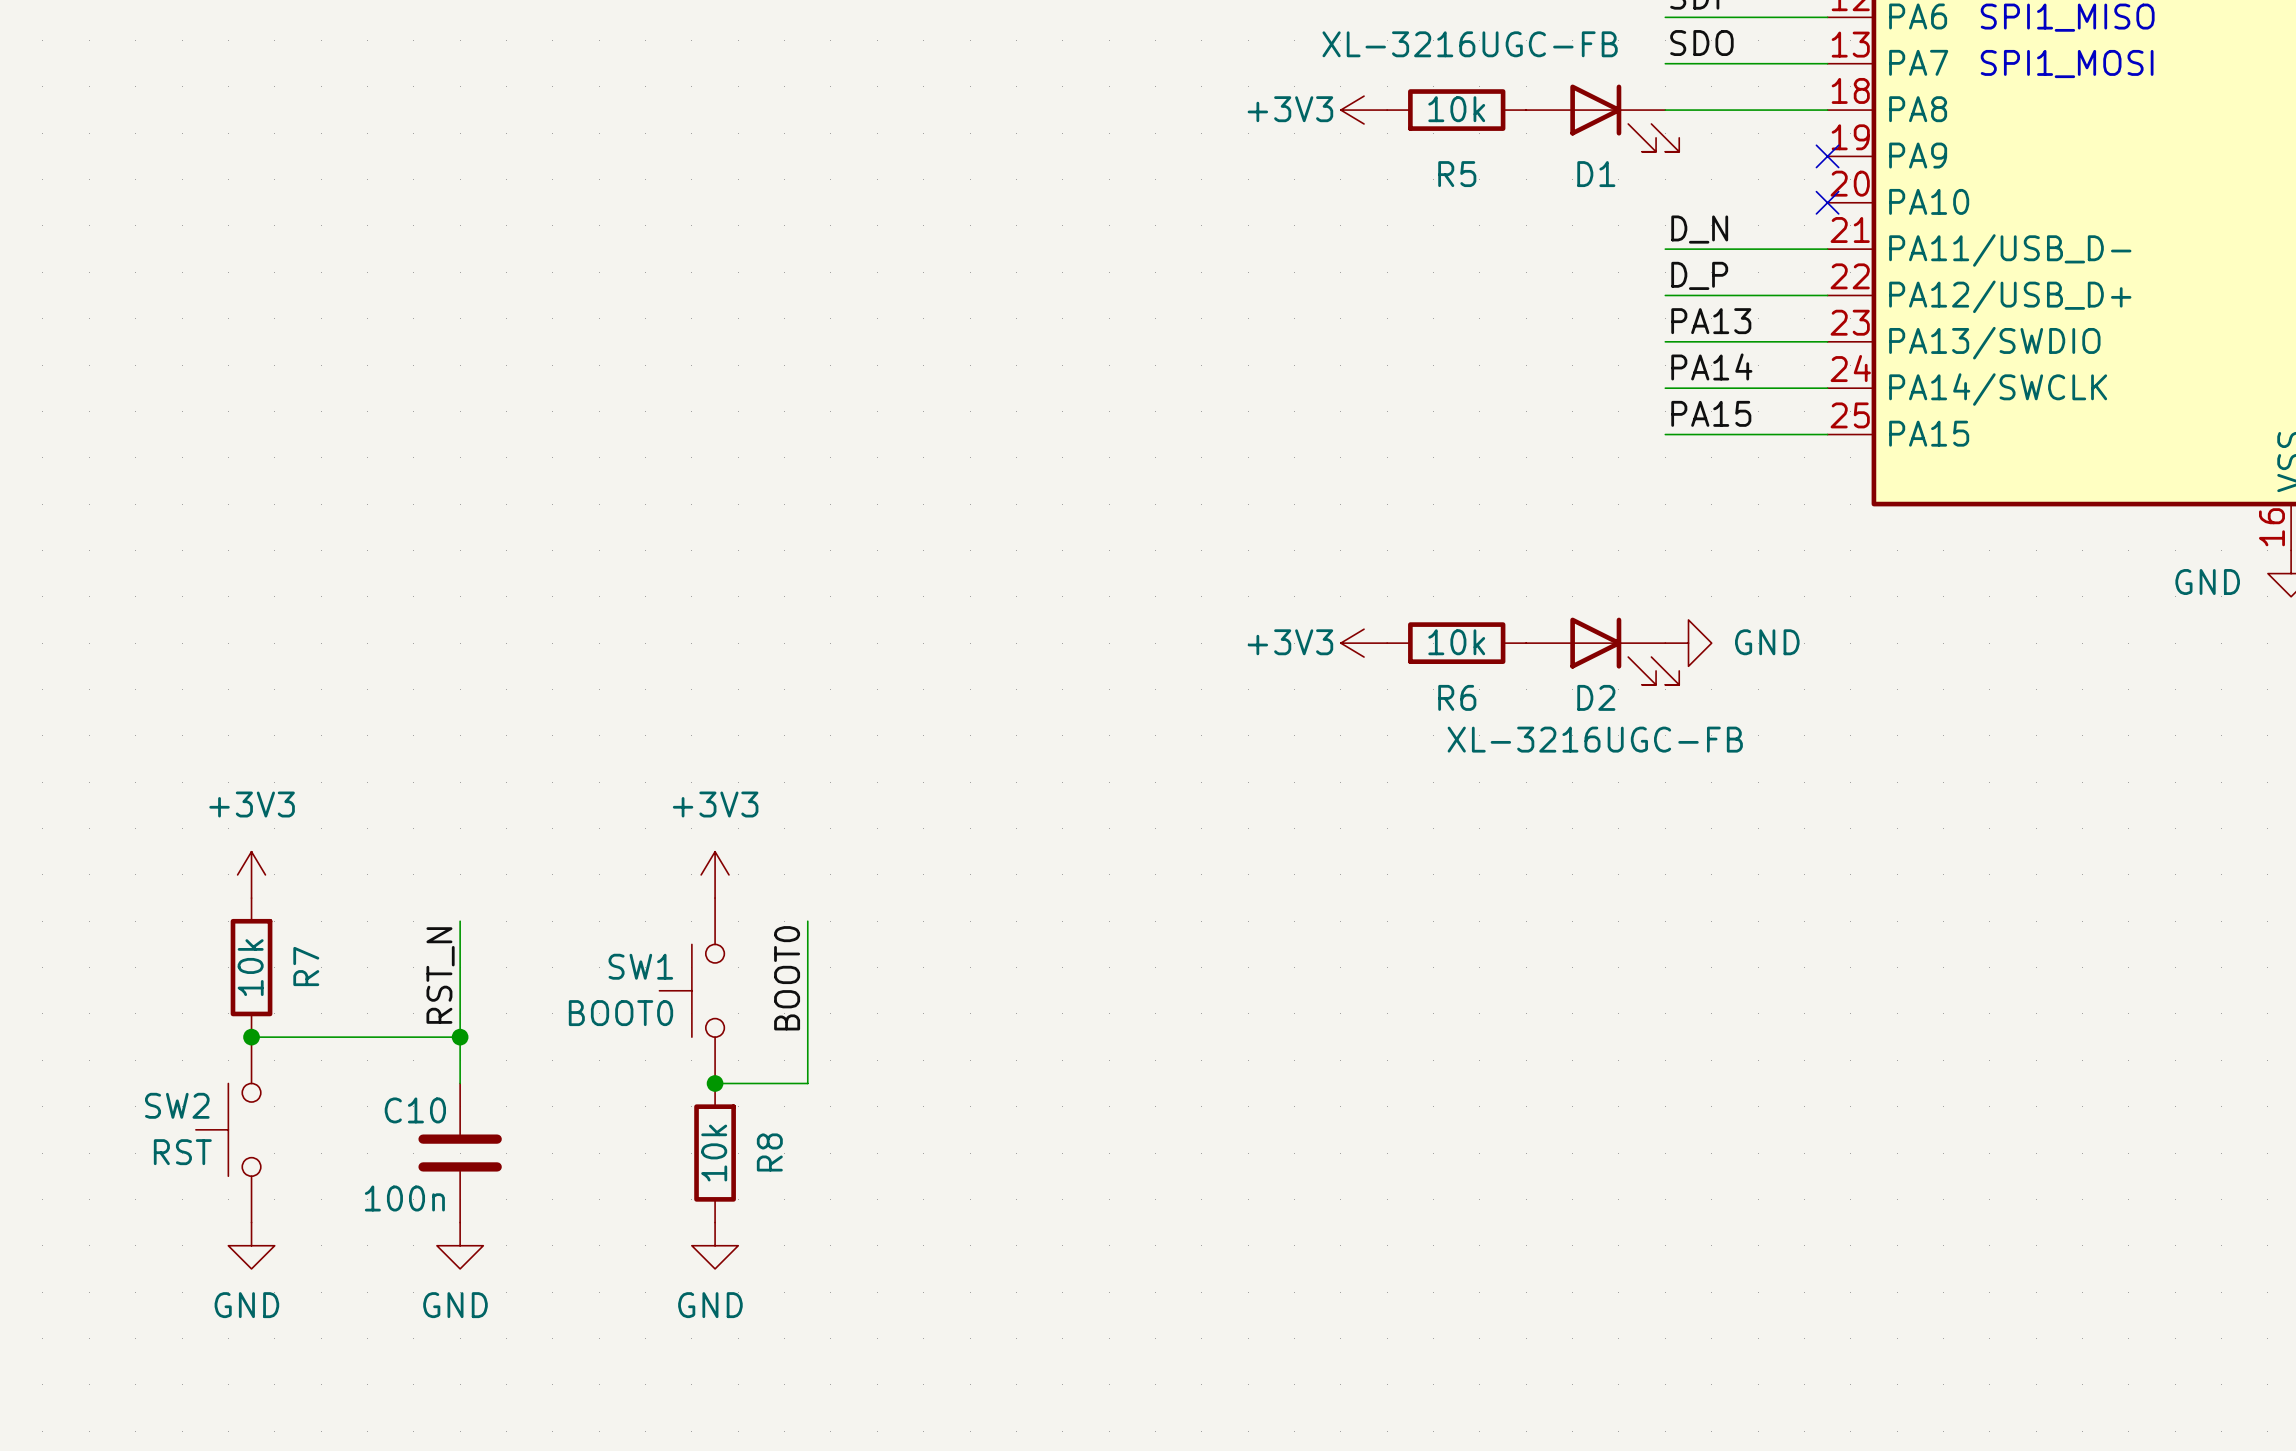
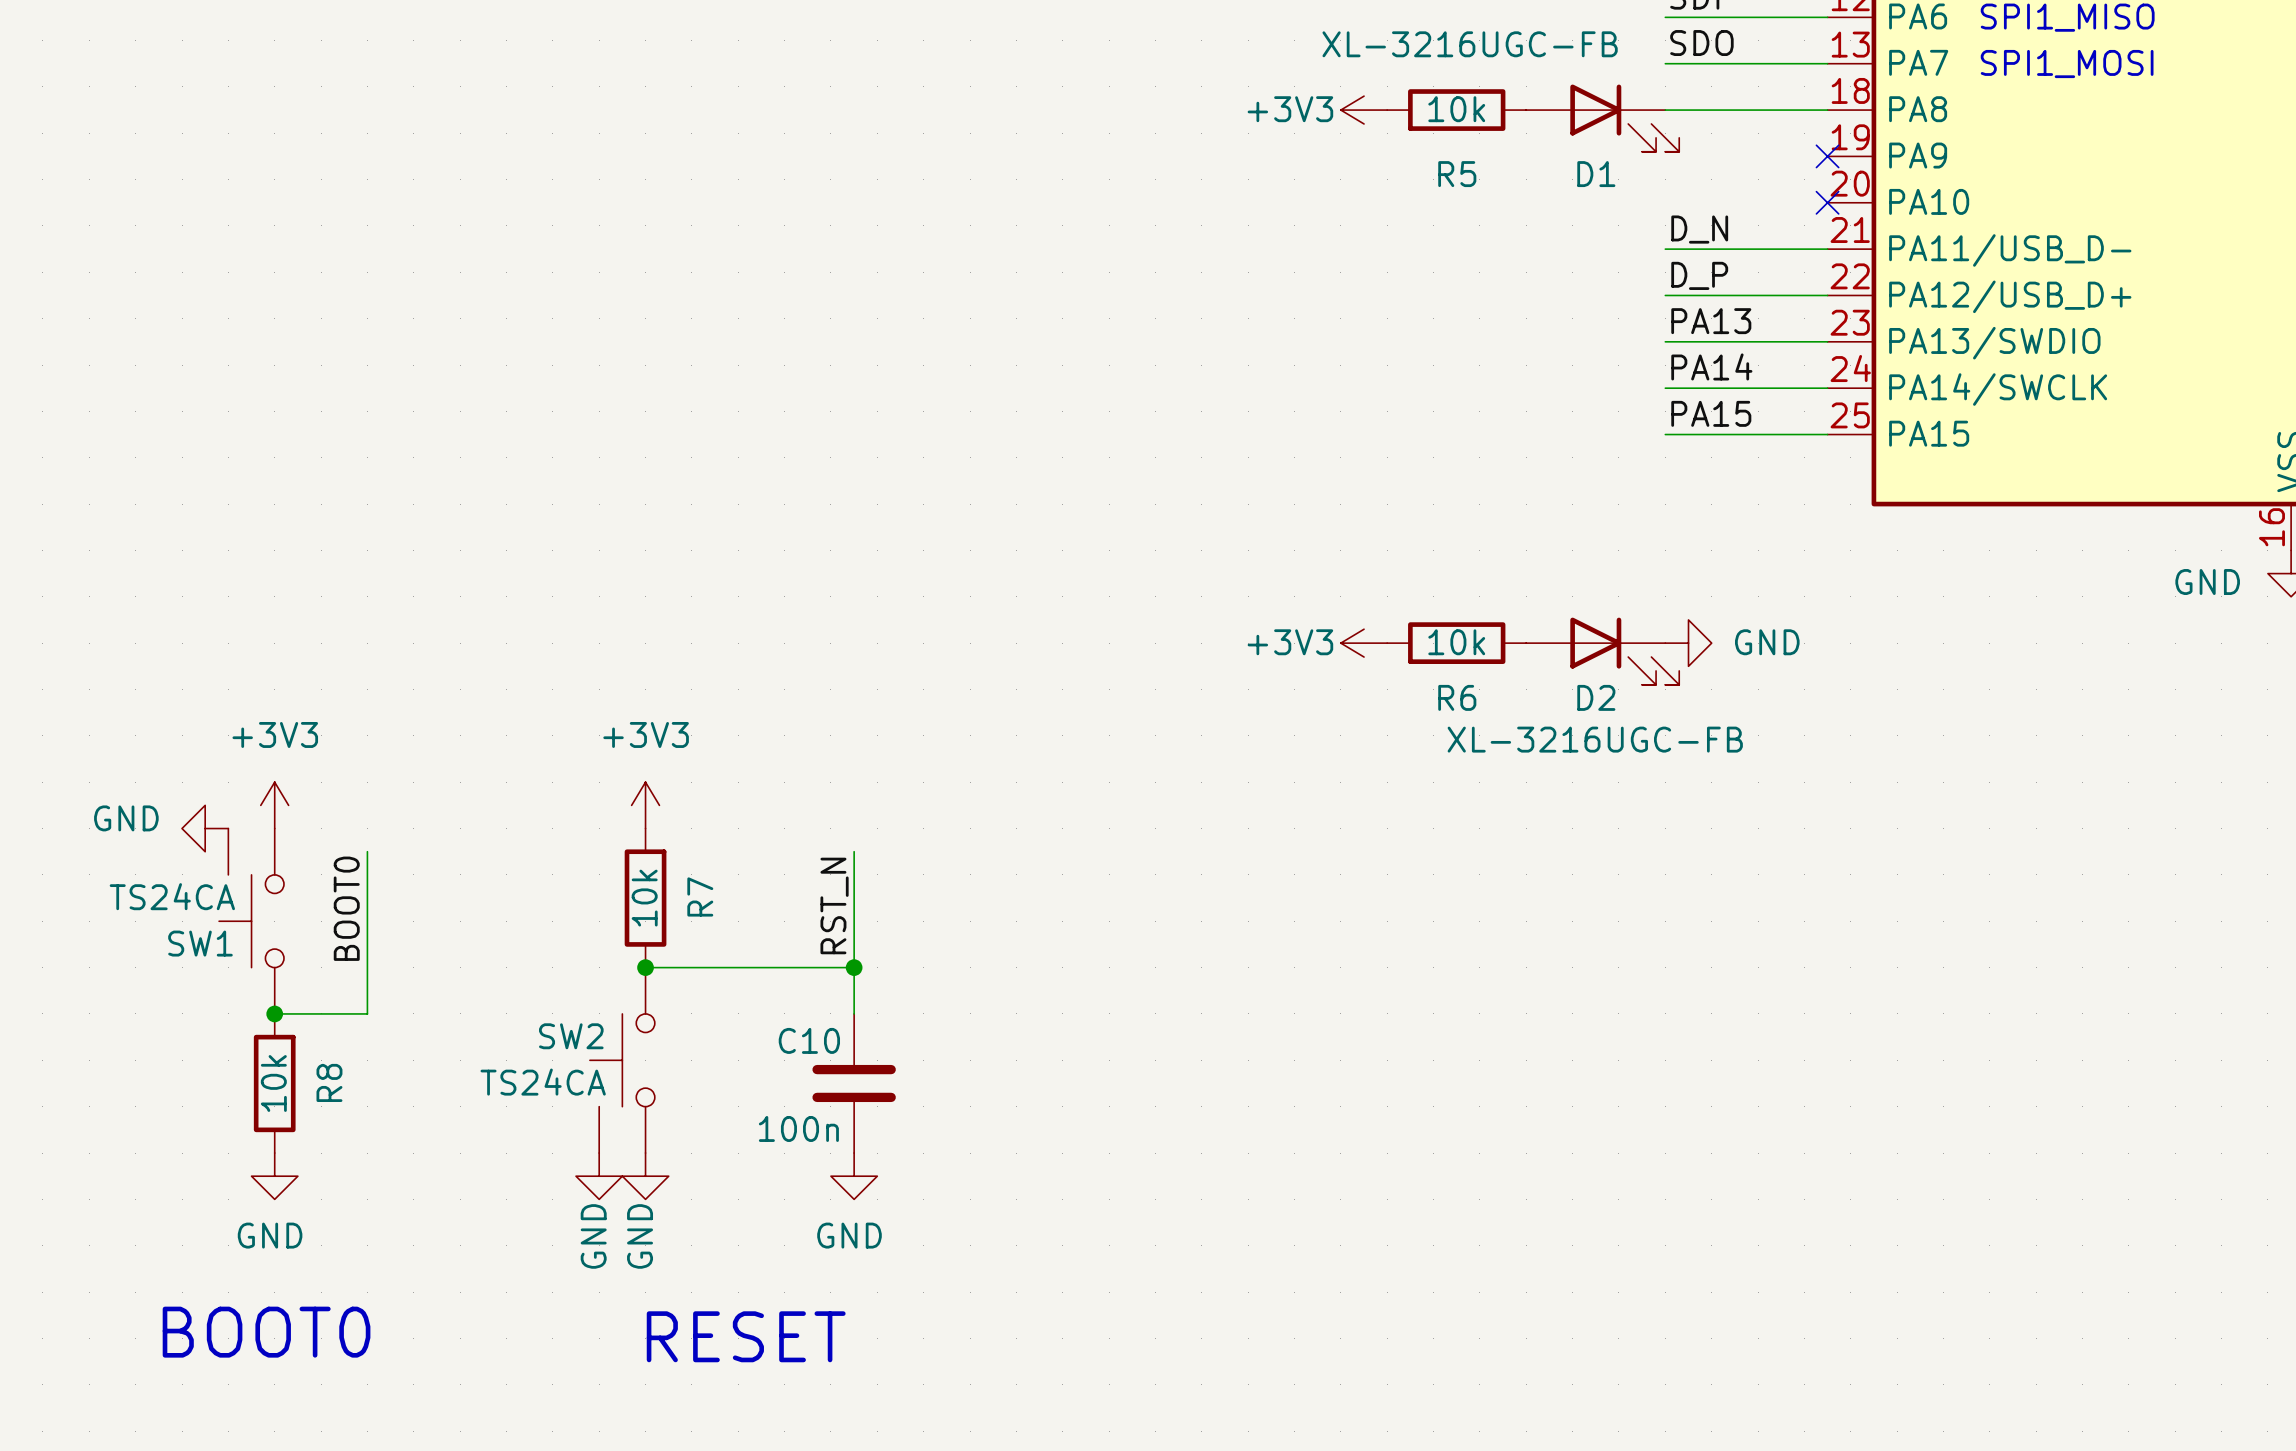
power symbol: none -> GND (205, 828)
power symbol position: +3V3 (251, 874) -> +3V3 (274, 805)
power symbol position: +3V3 (715, 874) -> +3V3 (645, 805)
SW1 symbol: [659, 898, 725, 1084] -> [219, 828, 284, 1014]
wire: (460, 921) (460, 1083) -> (854, 851) (854, 1013)
wire: (807, 921) (807, 1083) (715, 1083) -> (367, 851) (367, 1013) (274, 1013)
SW1 name position: SW1 (640, 966) -> SW1 (200, 943)
R7 position: (251, 967) -> (645, 898)
junction: none -> (645, 967)
junction: none -> (854, 967)
label position: RST_N (440, 975) -> RST_N (834, 905)
label position: BOOT0 (787, 978) -> BOOT0 (346, 908)
SW1 value: BOOT0 (620, 1013) -> TS24CA (172, 896)
SW2 symbol: [195, 1037, 261, 1223] -> [589, 967, 655, 1154]
wire: (251, 1037) (460, 1037) -> (645, 967) (854, 967)
junction position: (251, 1037) -> (274, 1013)
junction: (460, 1037) -> none
junction: (715, 1083) -> none
SW2 value: RST (182, 1152) -> TS24CA (543, 1082)
C10 position: (460, 1153) -> (854, 1083)
R8 position: (715, 1153) -> (274, 1083)
power symbol: none -> GND (599, 1176)
power symbol: none -> GND (645, 1176)
power symbol: none -> GND (854, 1176)
power symbol position: GND (251, 1245) -> GND (274, 1176)
power symbol: GND (460, 1245) -> none
power symbol: GND (715, 1245) -> none
text: none -> BOOT0 (266, 1332)
text: none -> RESET (746, 1336)

